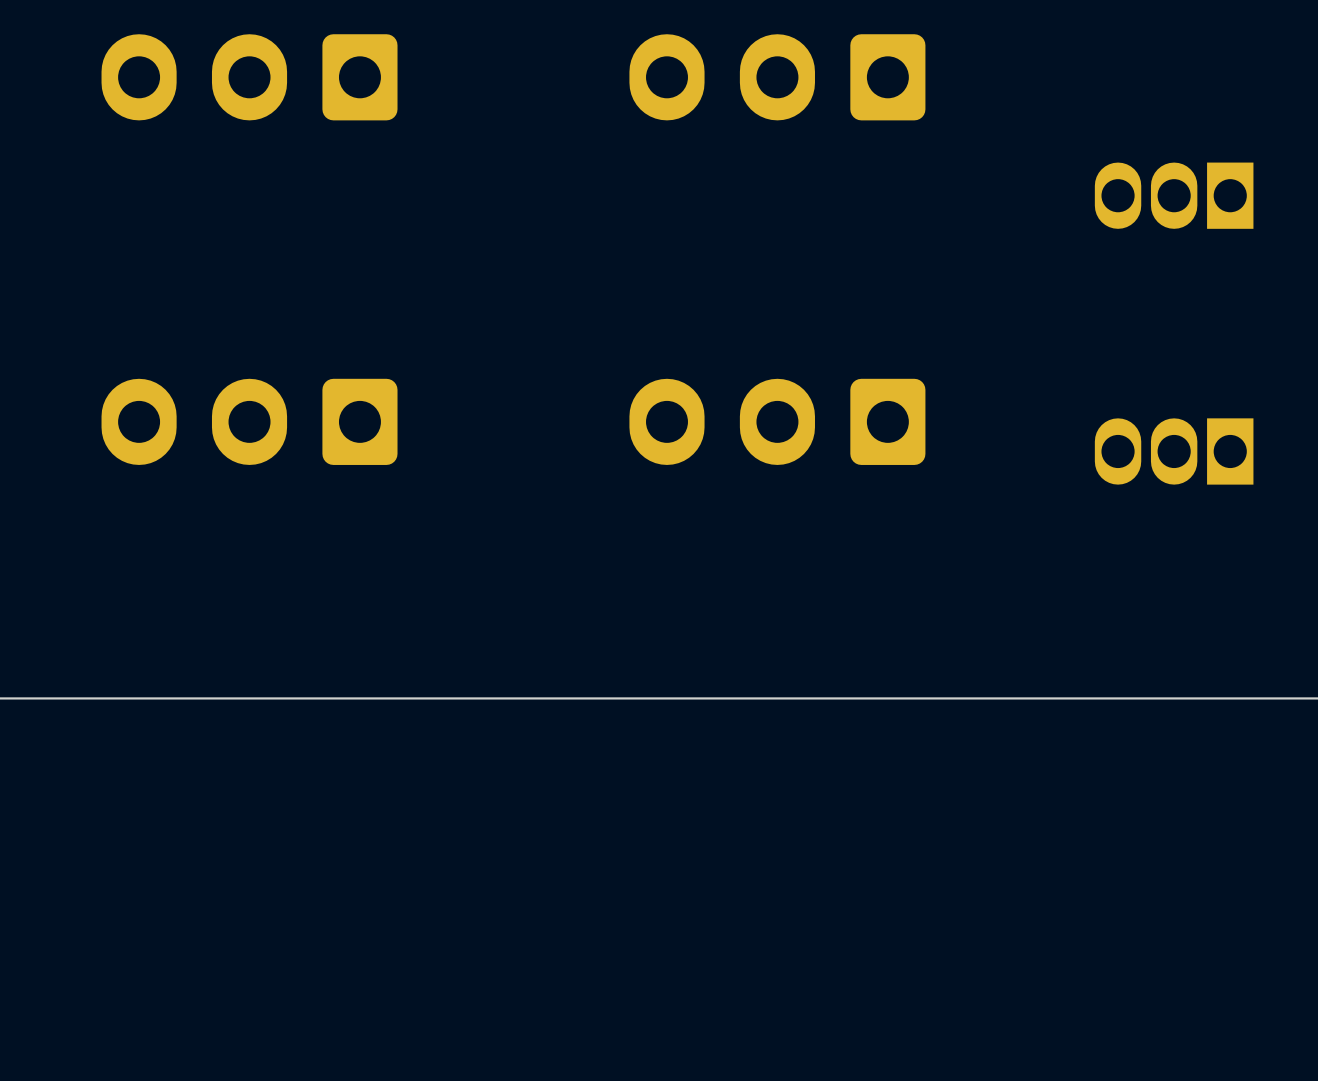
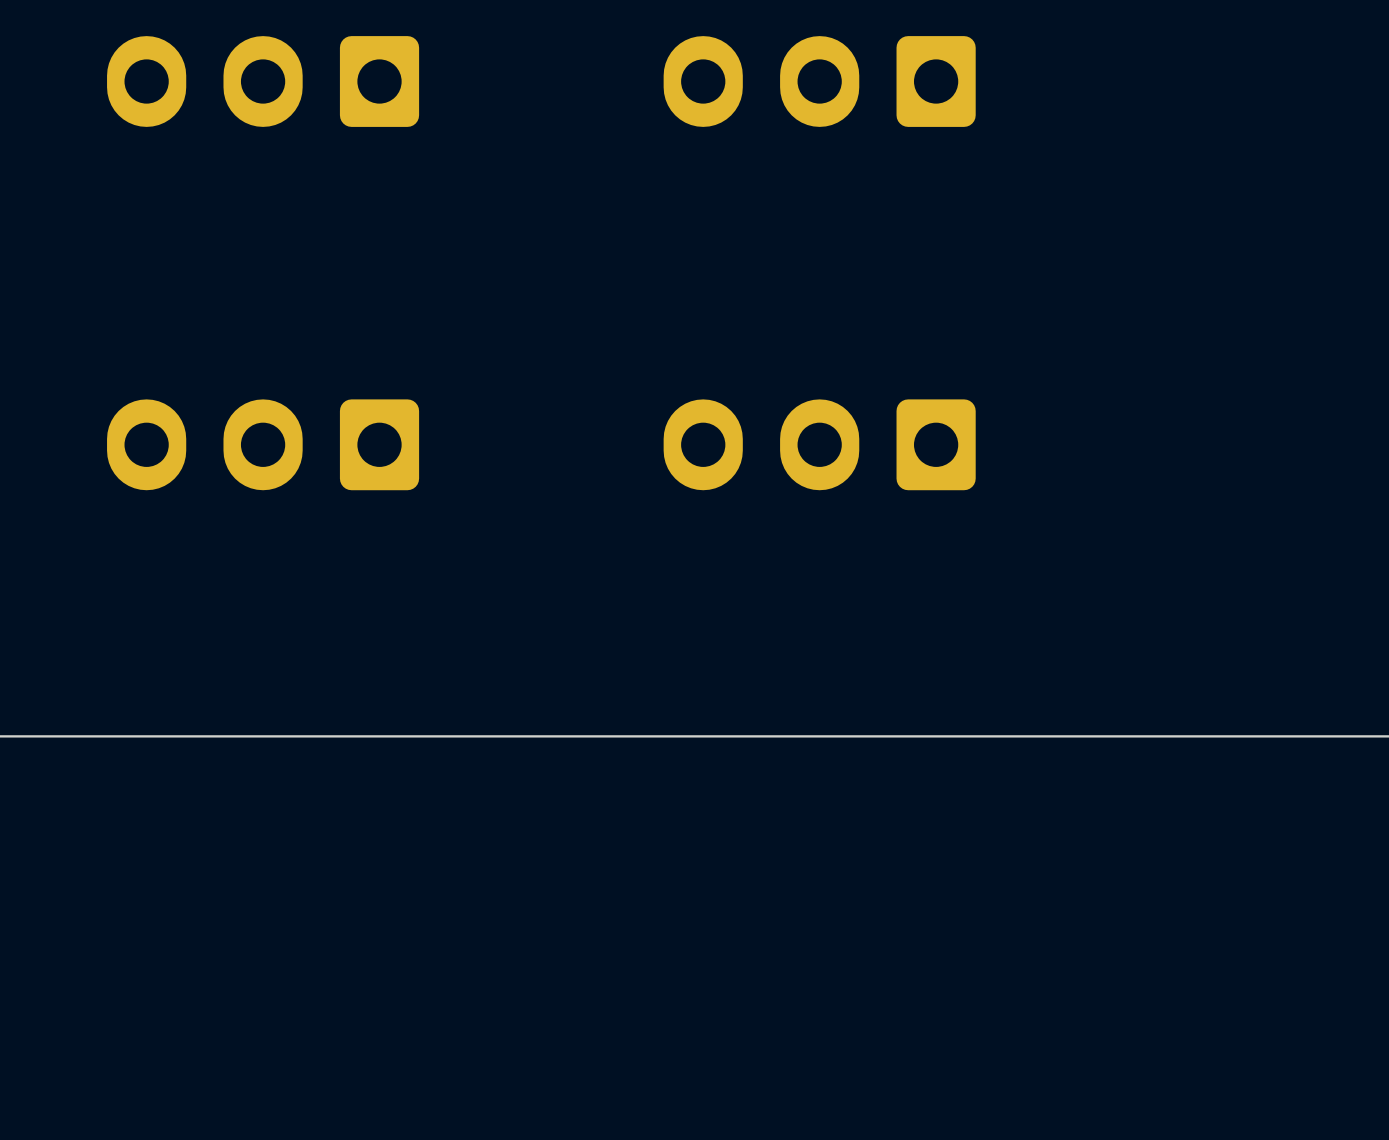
part: (1174, 195) -> none
part: (1174, 451) -> none

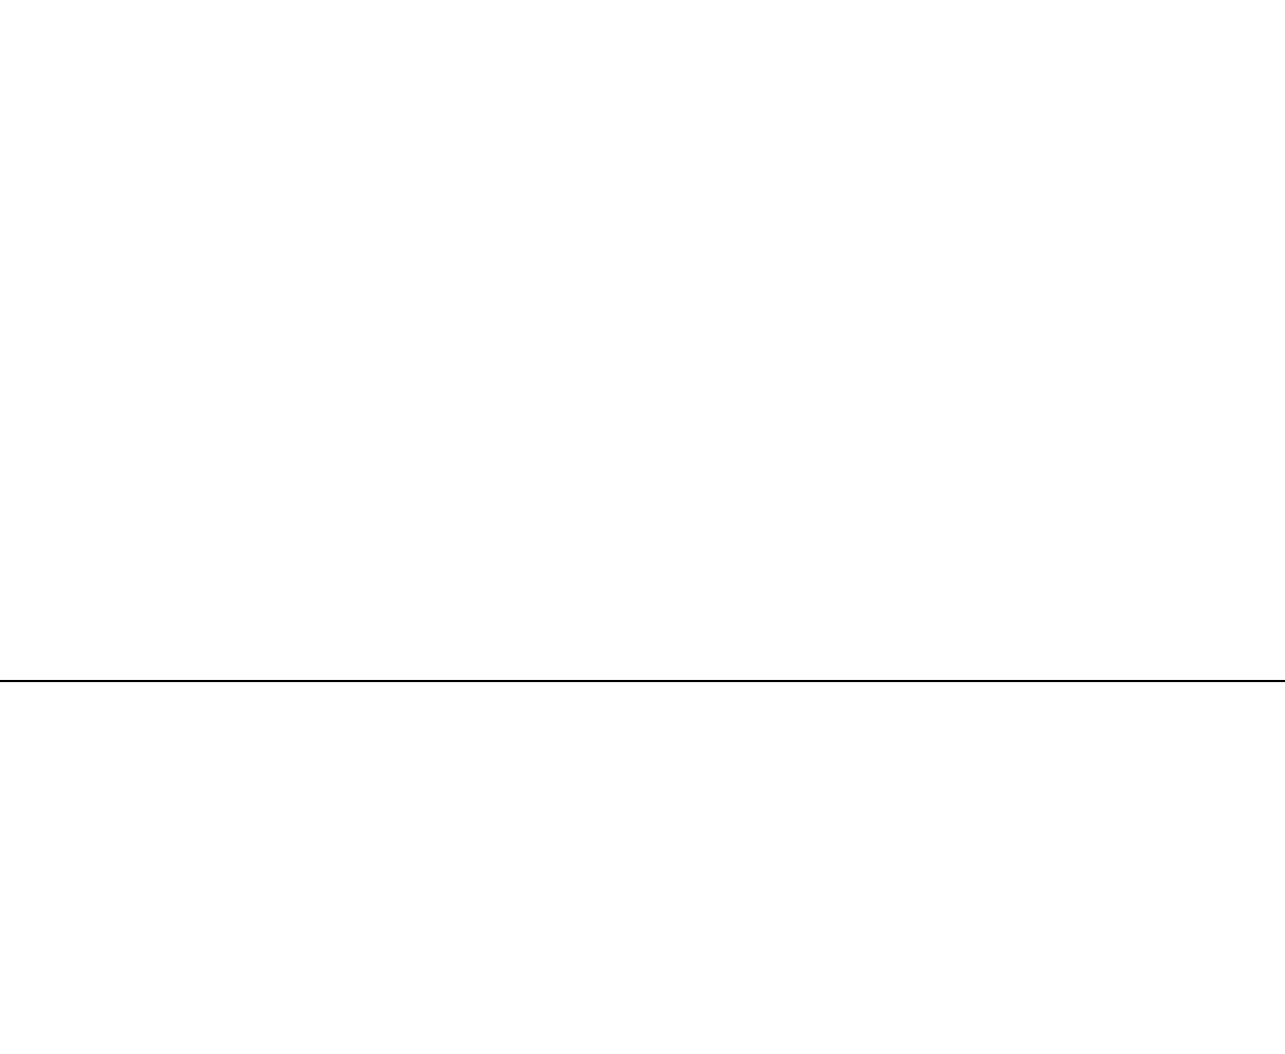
part: (263, 81) -> none
part: (819, 81) -> none
part: (263, 444) -> none
part: (819, 444) -> none

